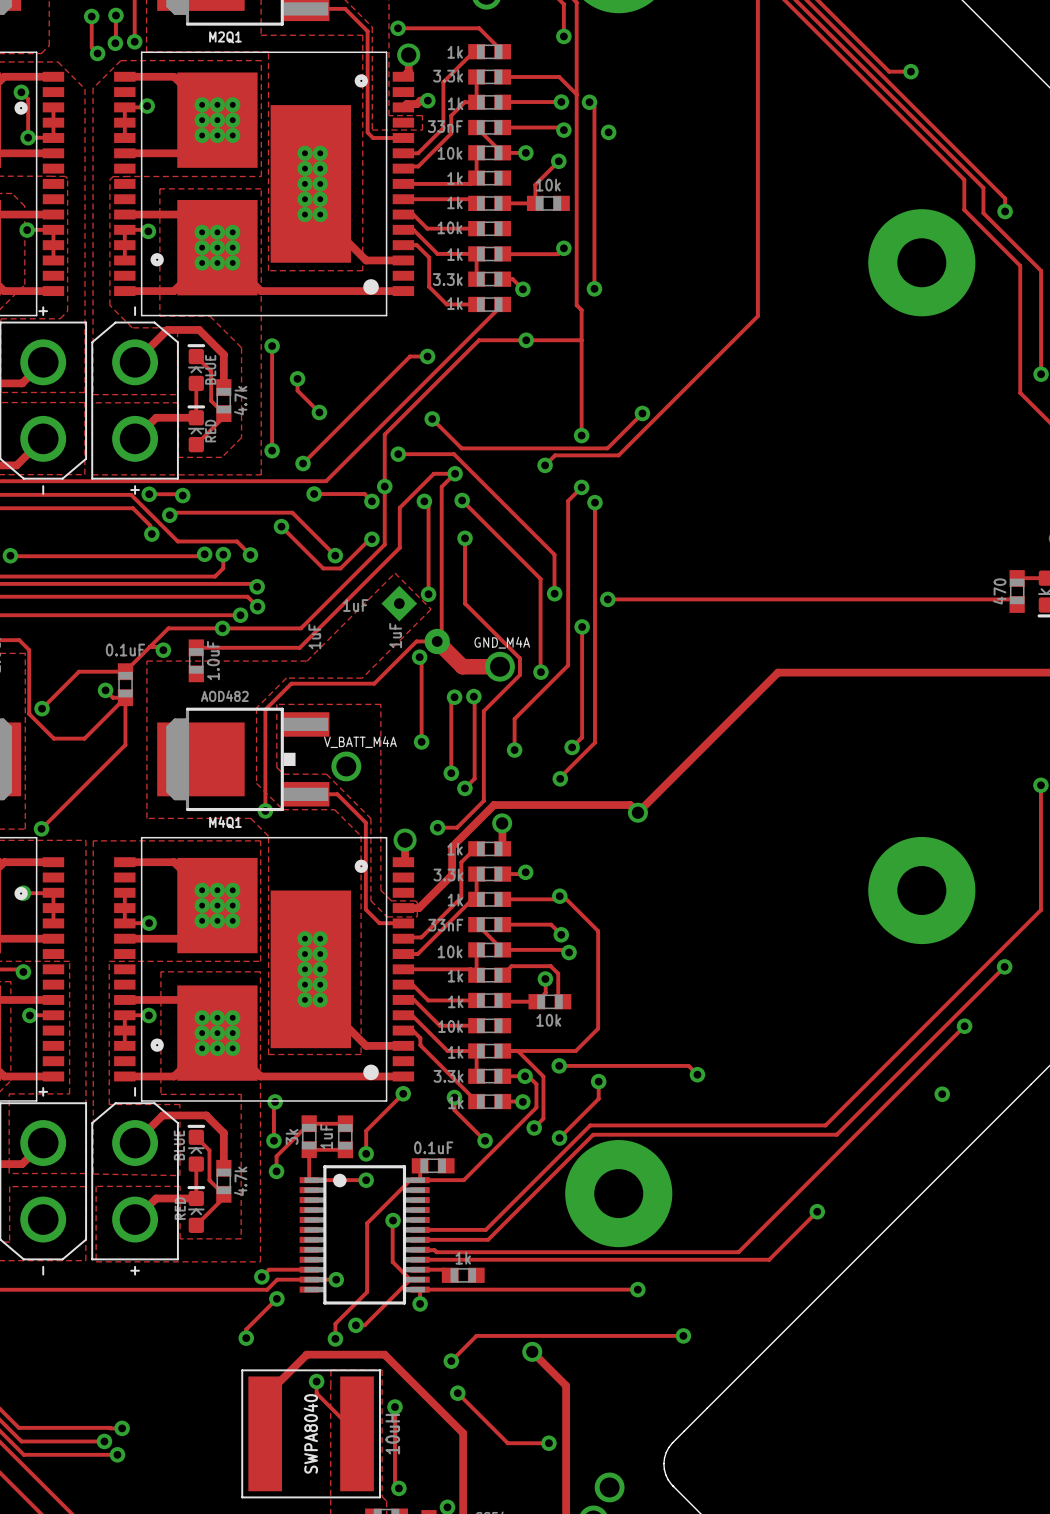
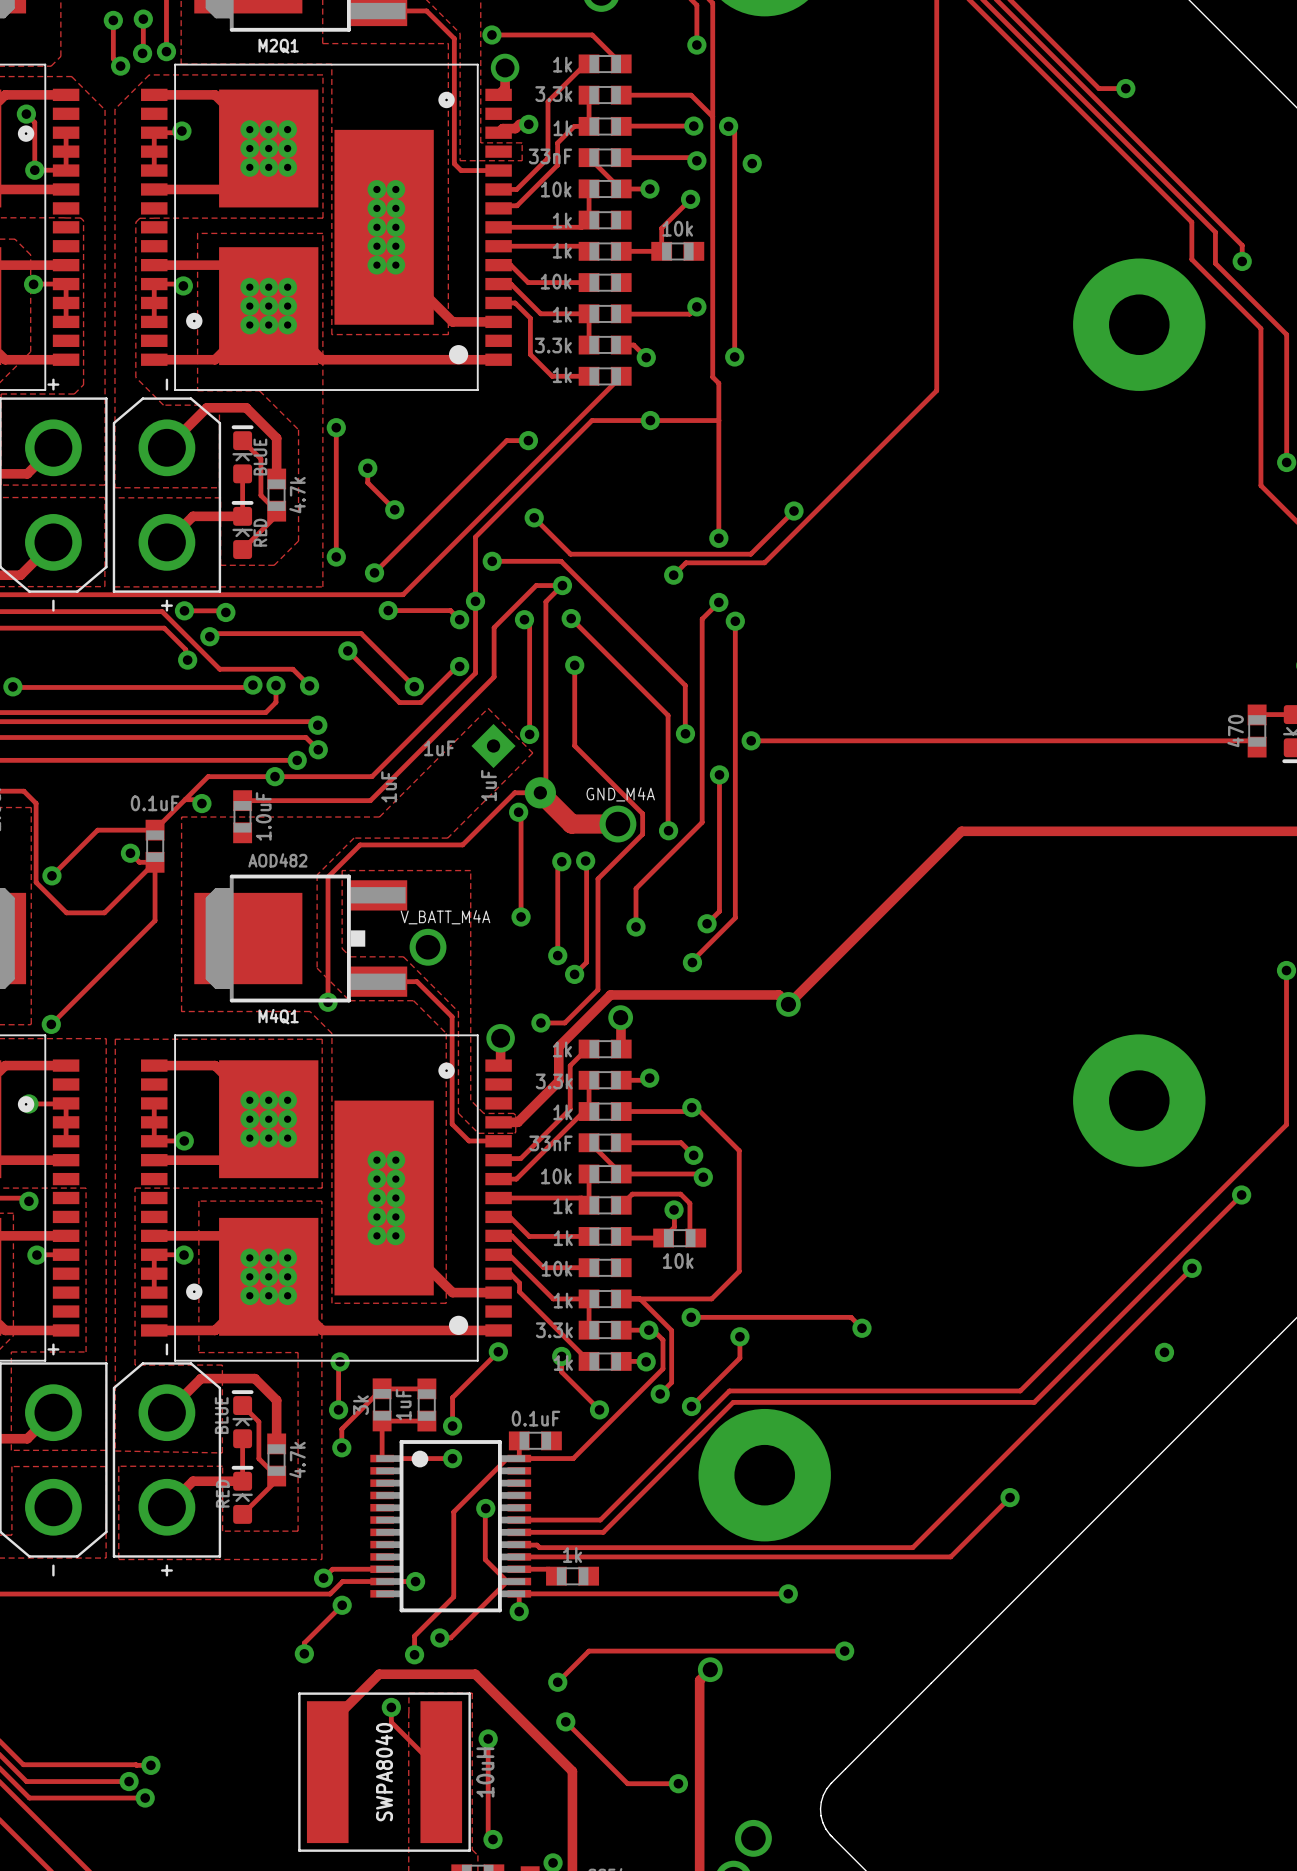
track: (532, 1351) (566, 1385) -> (710, 1669) (699, 1680) (699, 1712)
via position: (532, 1351) -> (710, 1669)

